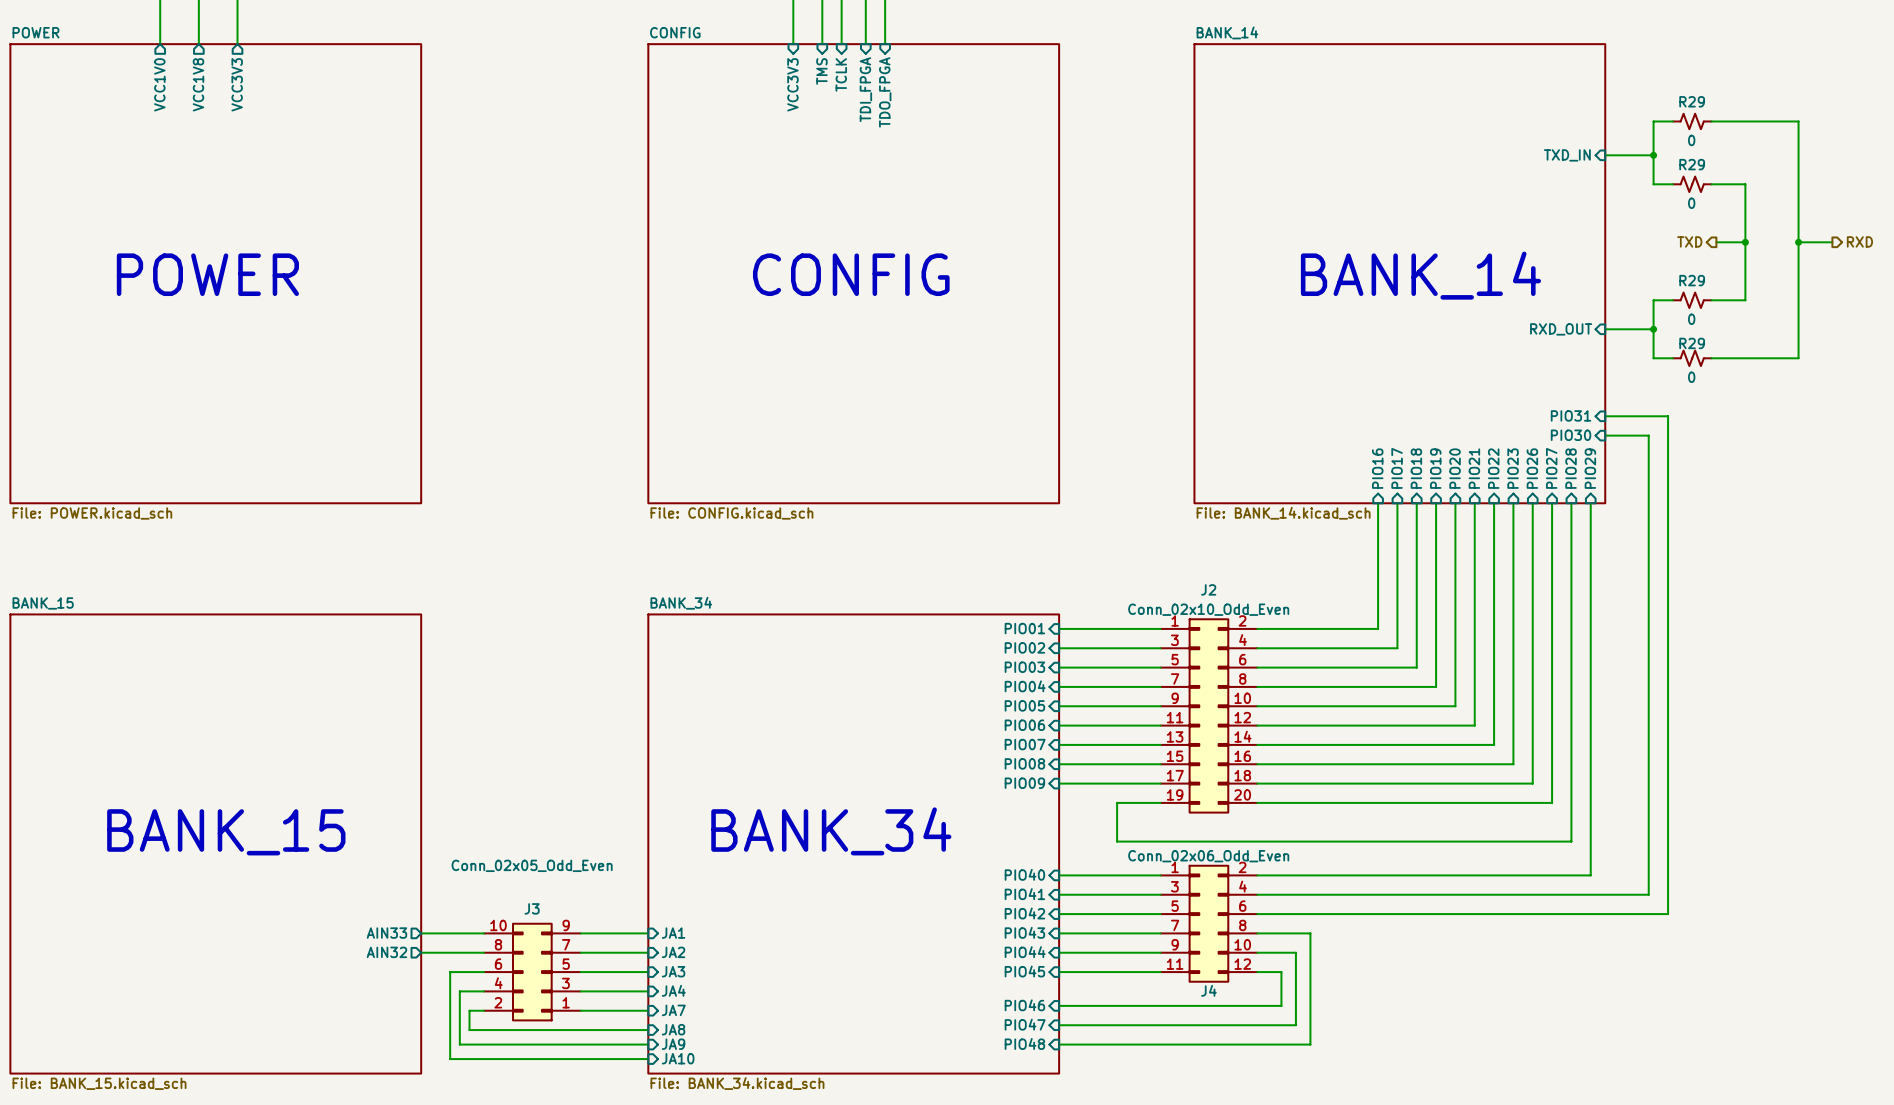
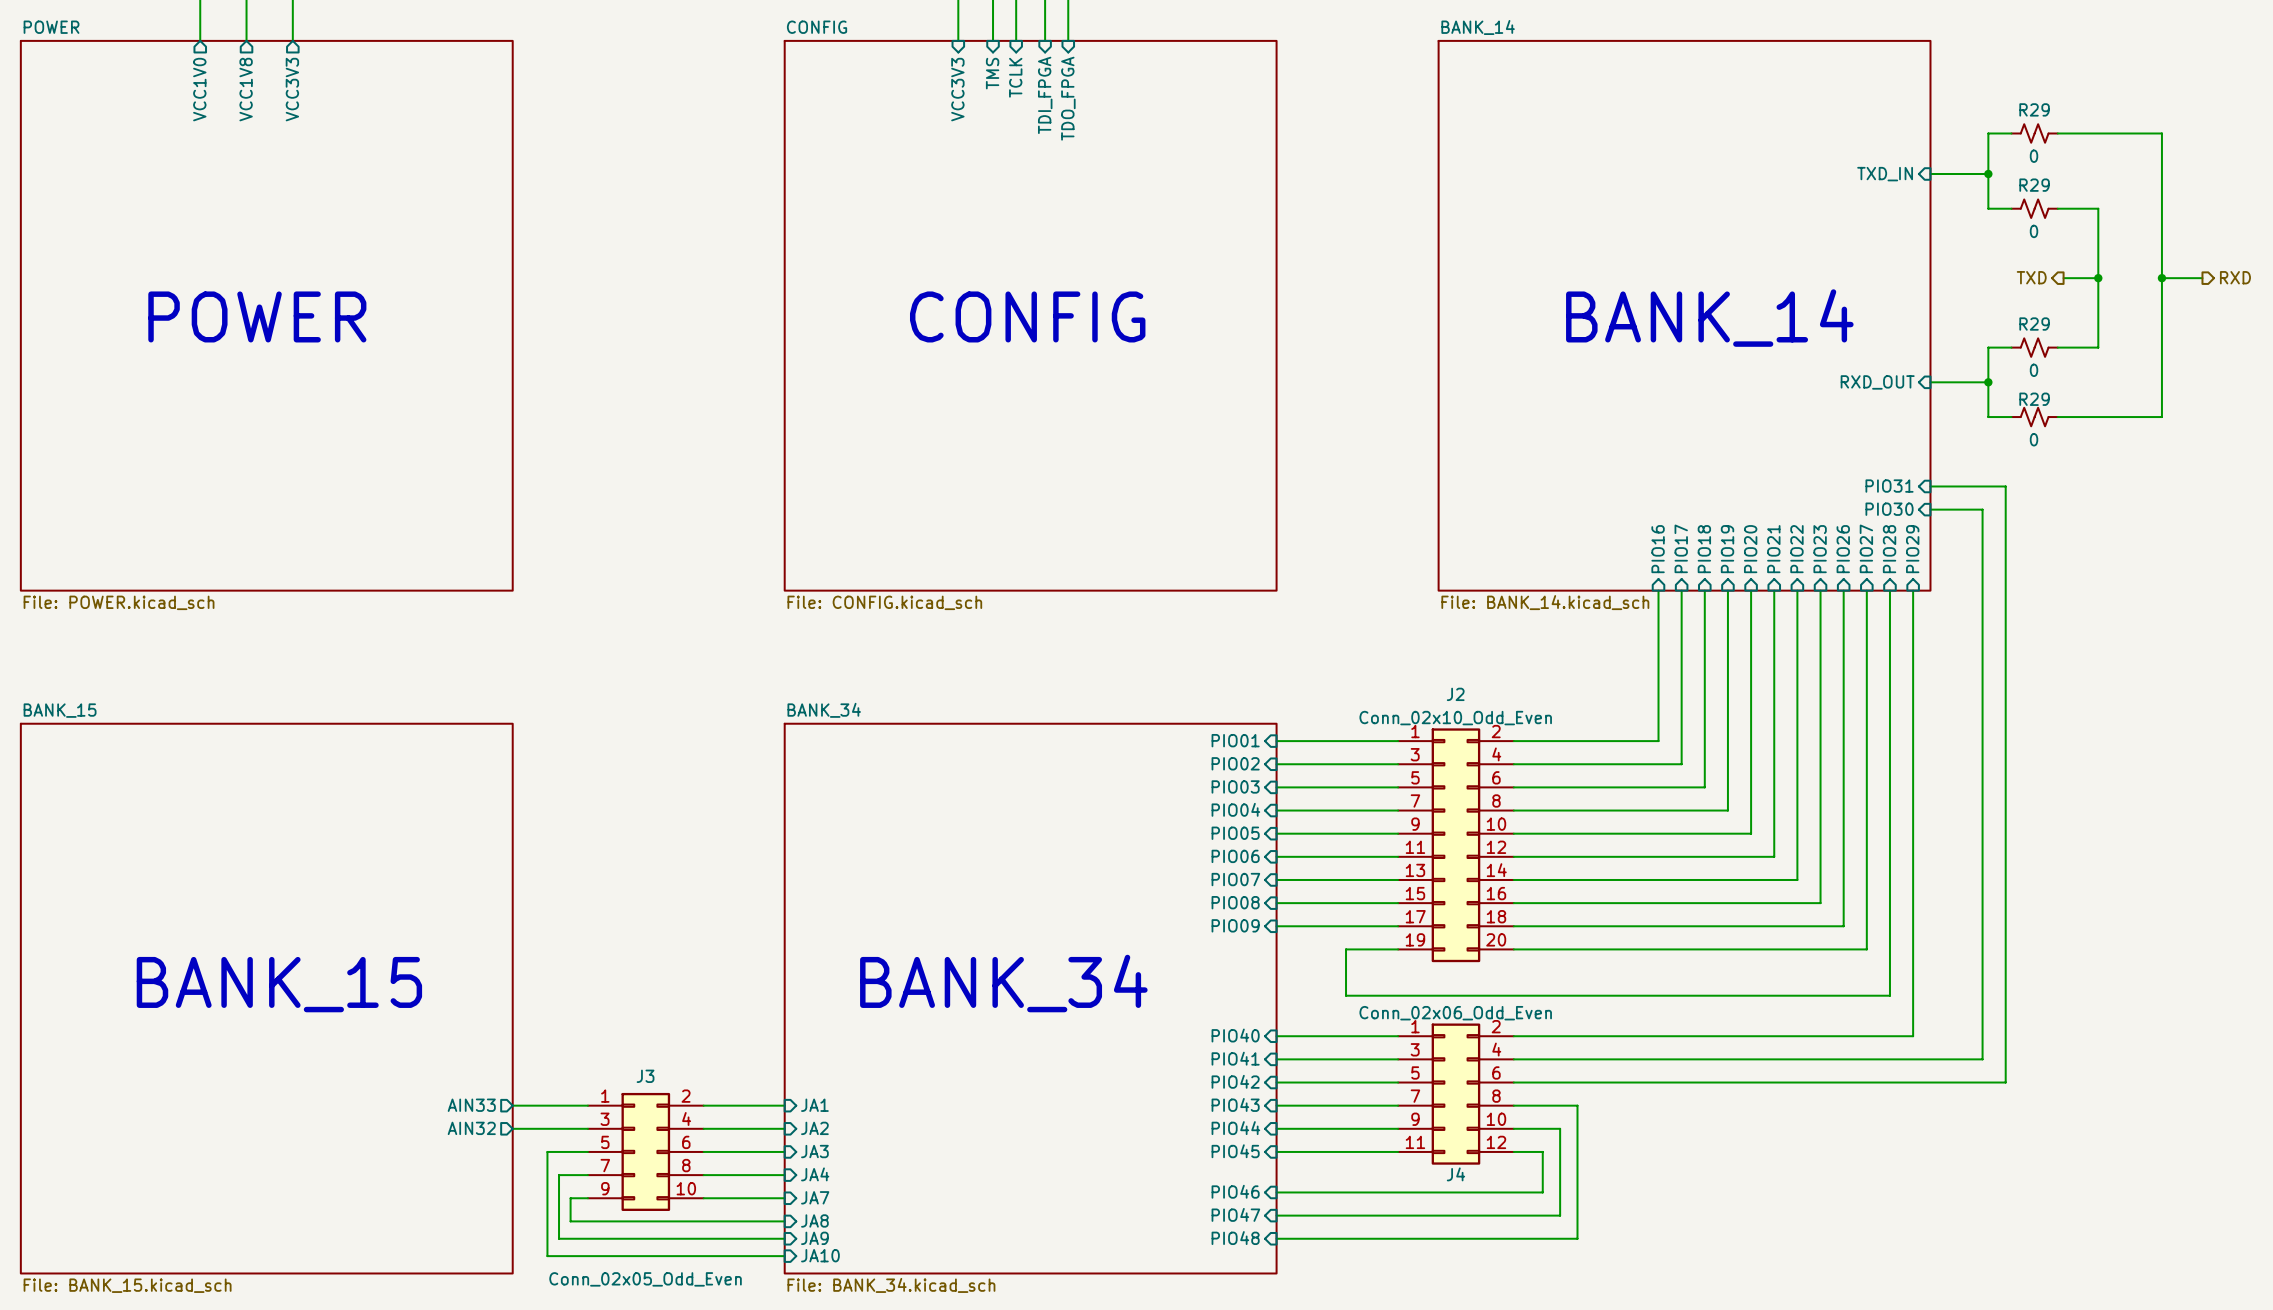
J3 rotation: 0° (532, 972) -> 180° (645, 1151)

